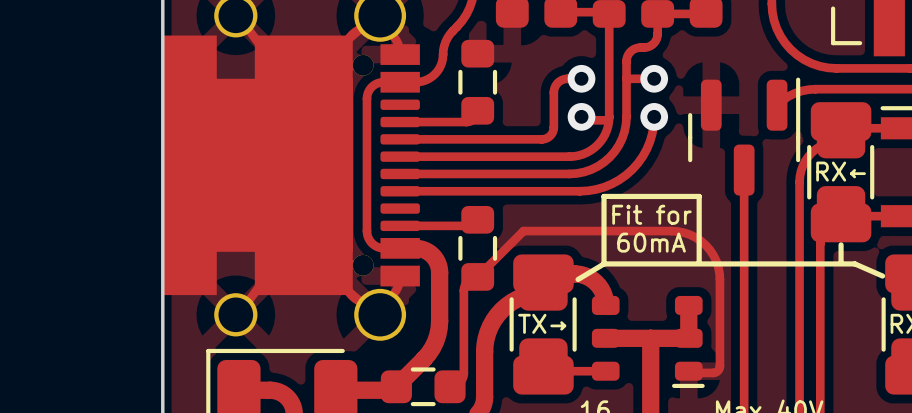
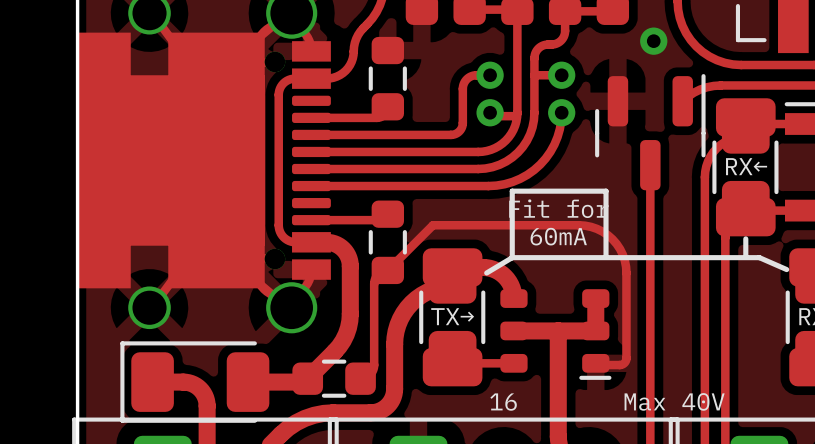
via: none -> (653, 41)

